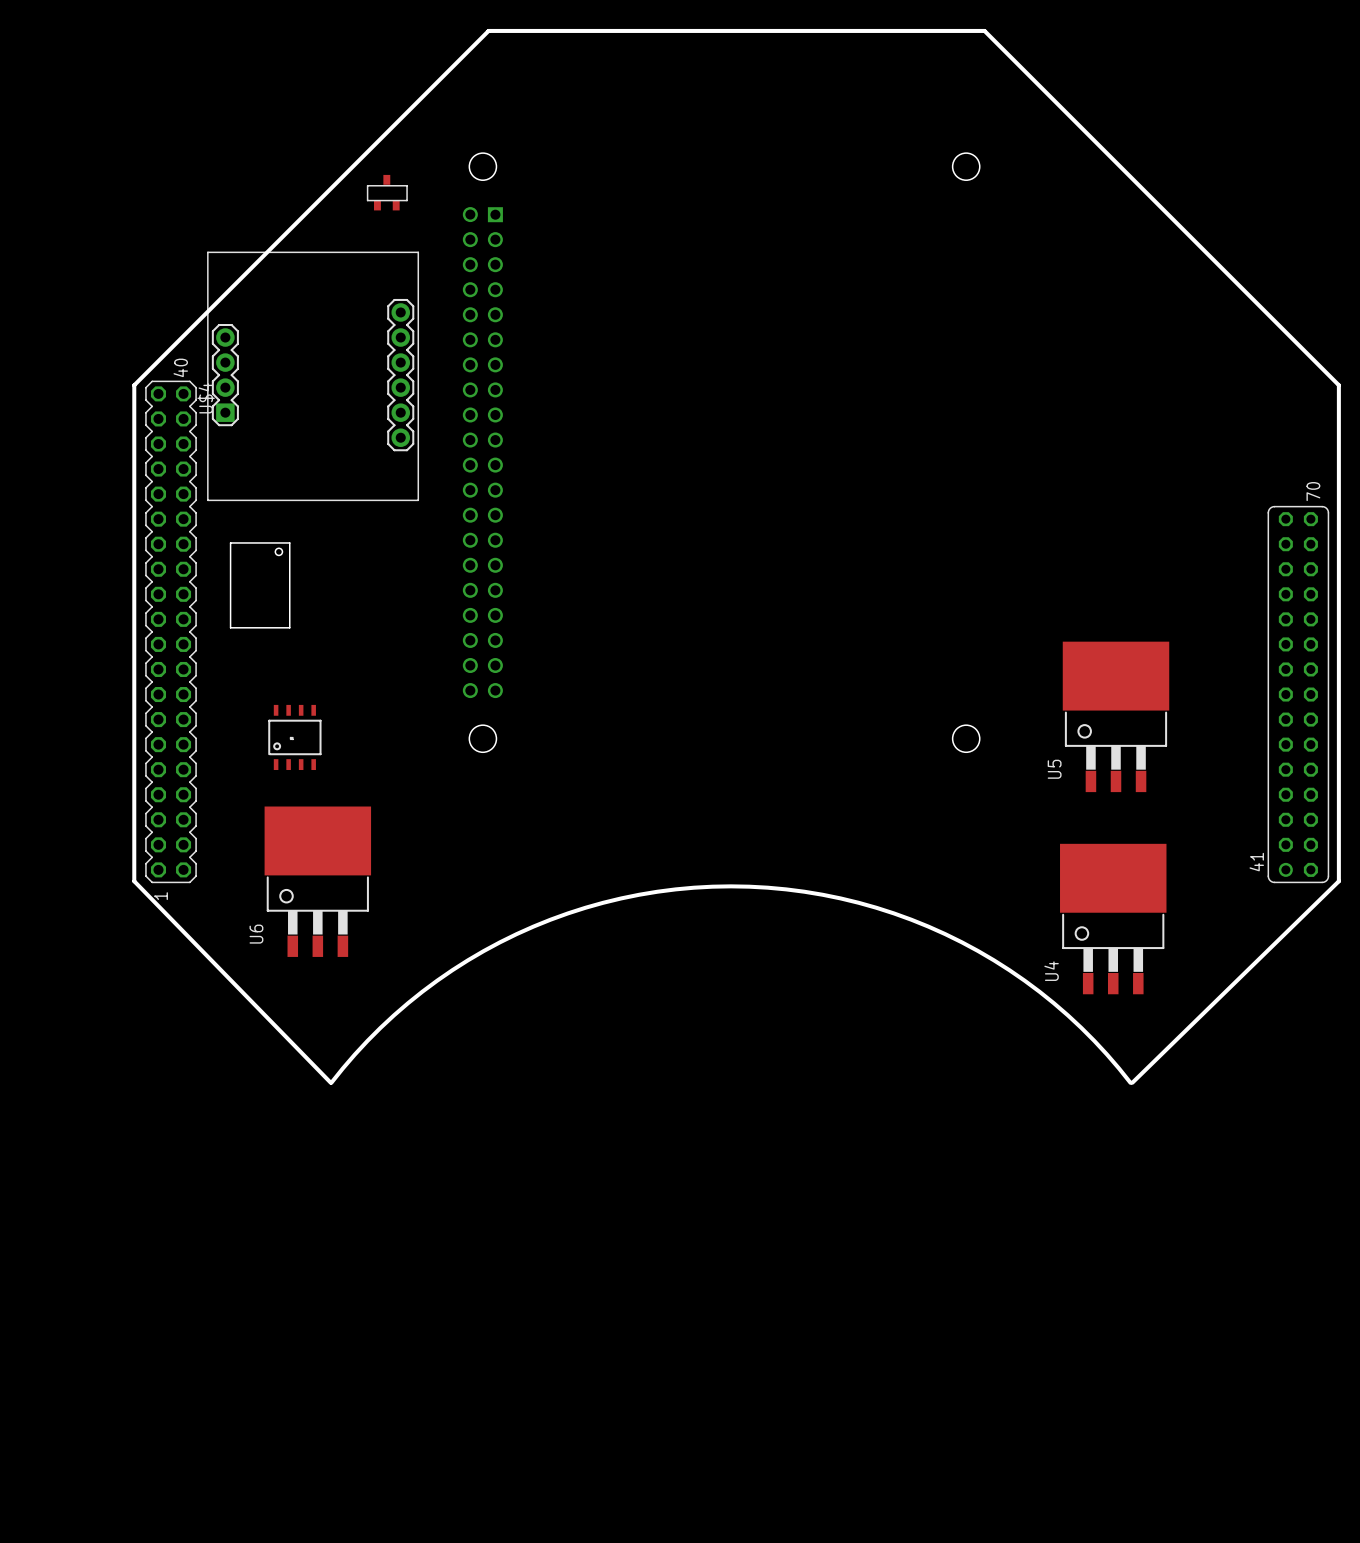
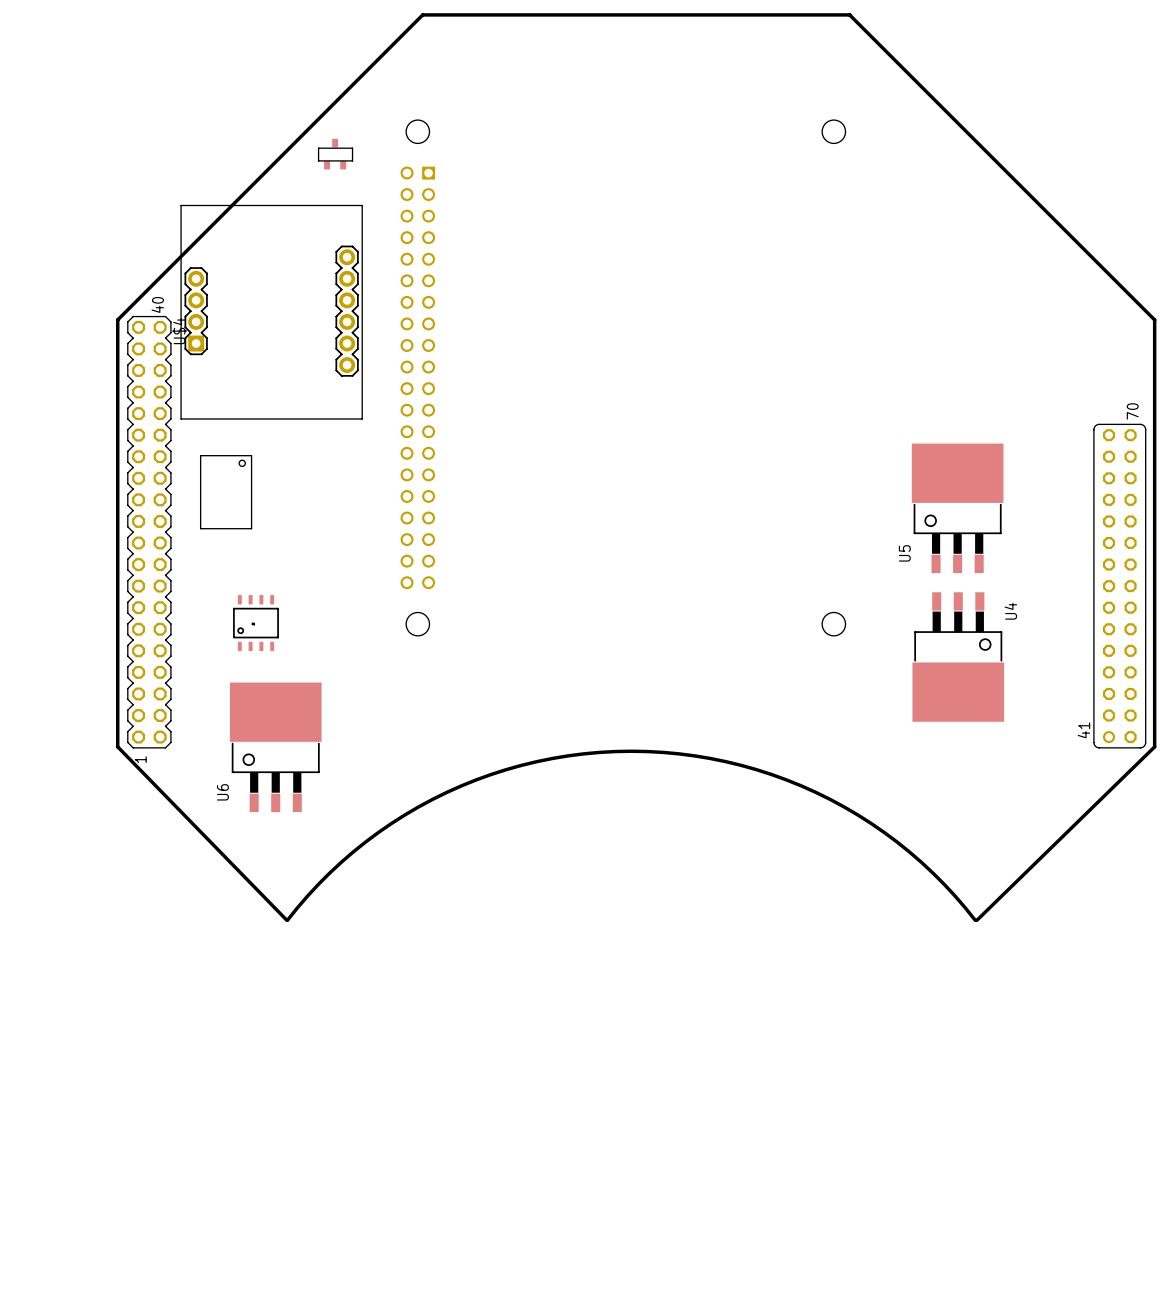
U5 position: (1116, 716) -> (957, 508)
U4 rotation: 0° (1113, 919) -> 180° (958, 657)
U4 position: (1113, 919) -> (958, 657)

